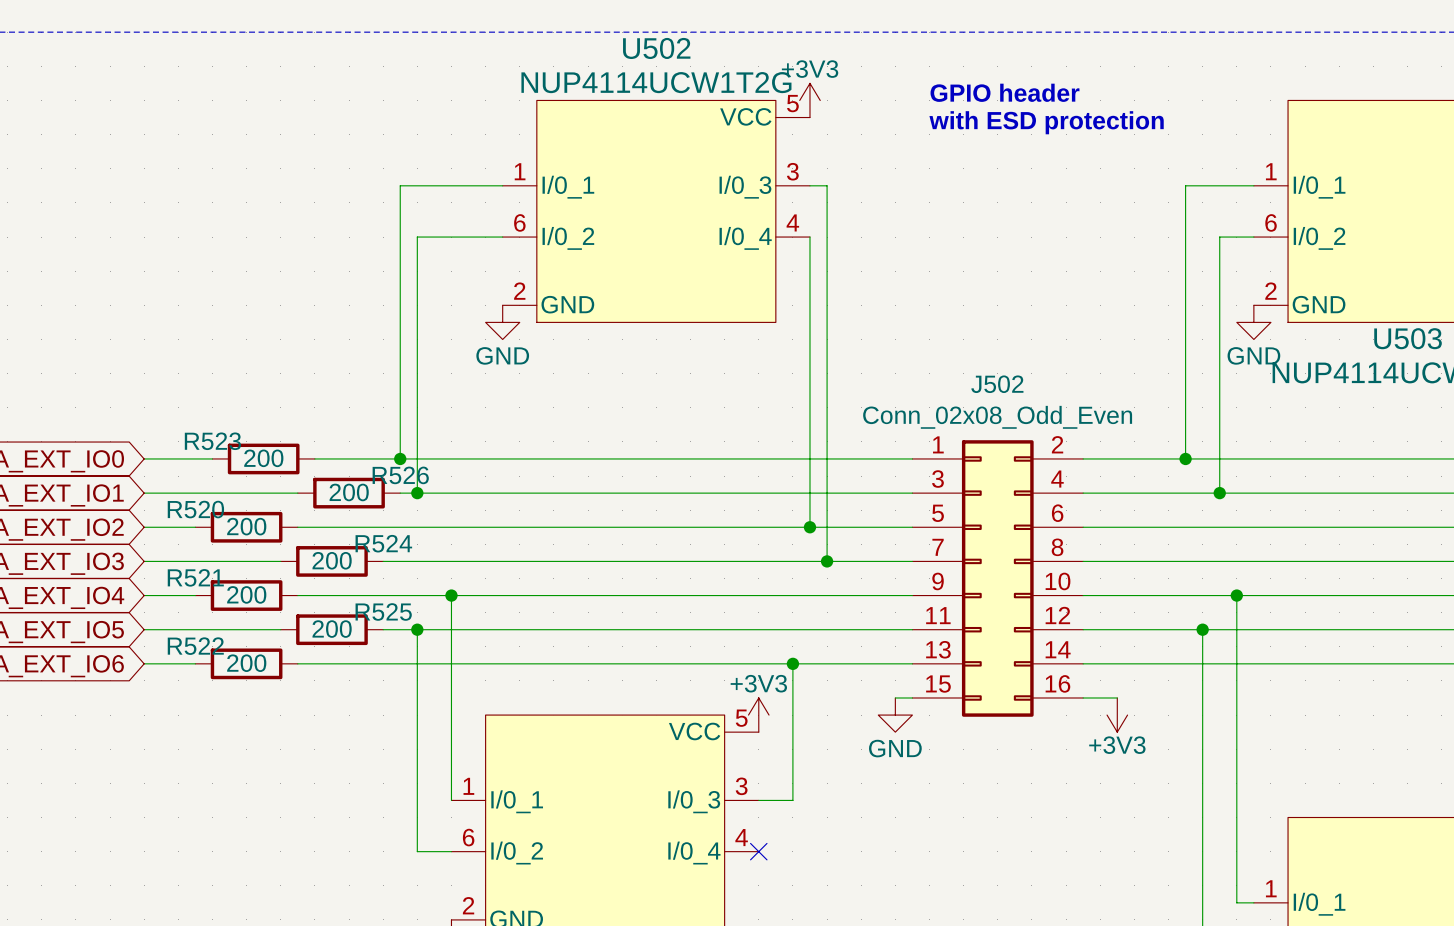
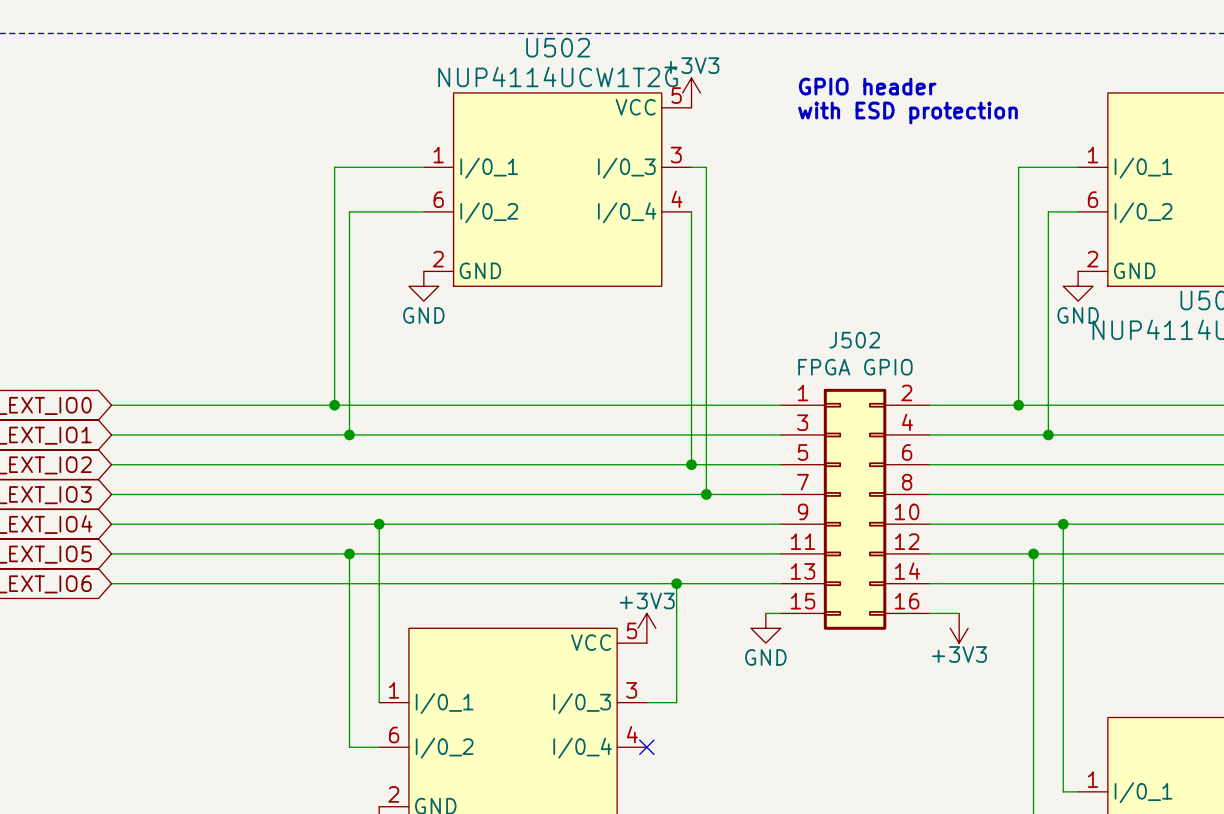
J502 value: Conn_02x08_Odd_Even (997, 417) -> FPGA GPIO (855, 367)
wire: none -> (171, 405) (260, 405)
R523: 200 (263, 458) -> none
wire: none -> (245, 434) (334, 434)
R526: 200 (349, 493) -> none
wire: none -> (156, 464) (245, 464)
R520: 200 (246, 527) -> none
wire: none -> (230, 494) (319, 494)
R524: 200 (331, 561) -> none
wire: none -> (156, 524) (245, 524)
R521: 200 (246, 595) -> none
wire: none -> (230, 553) (319, 553)
R525: 200 (331, 629) -> none
wire: none -> (156, 583) (245, 583)
R522: 200 (246, 663) -> none

